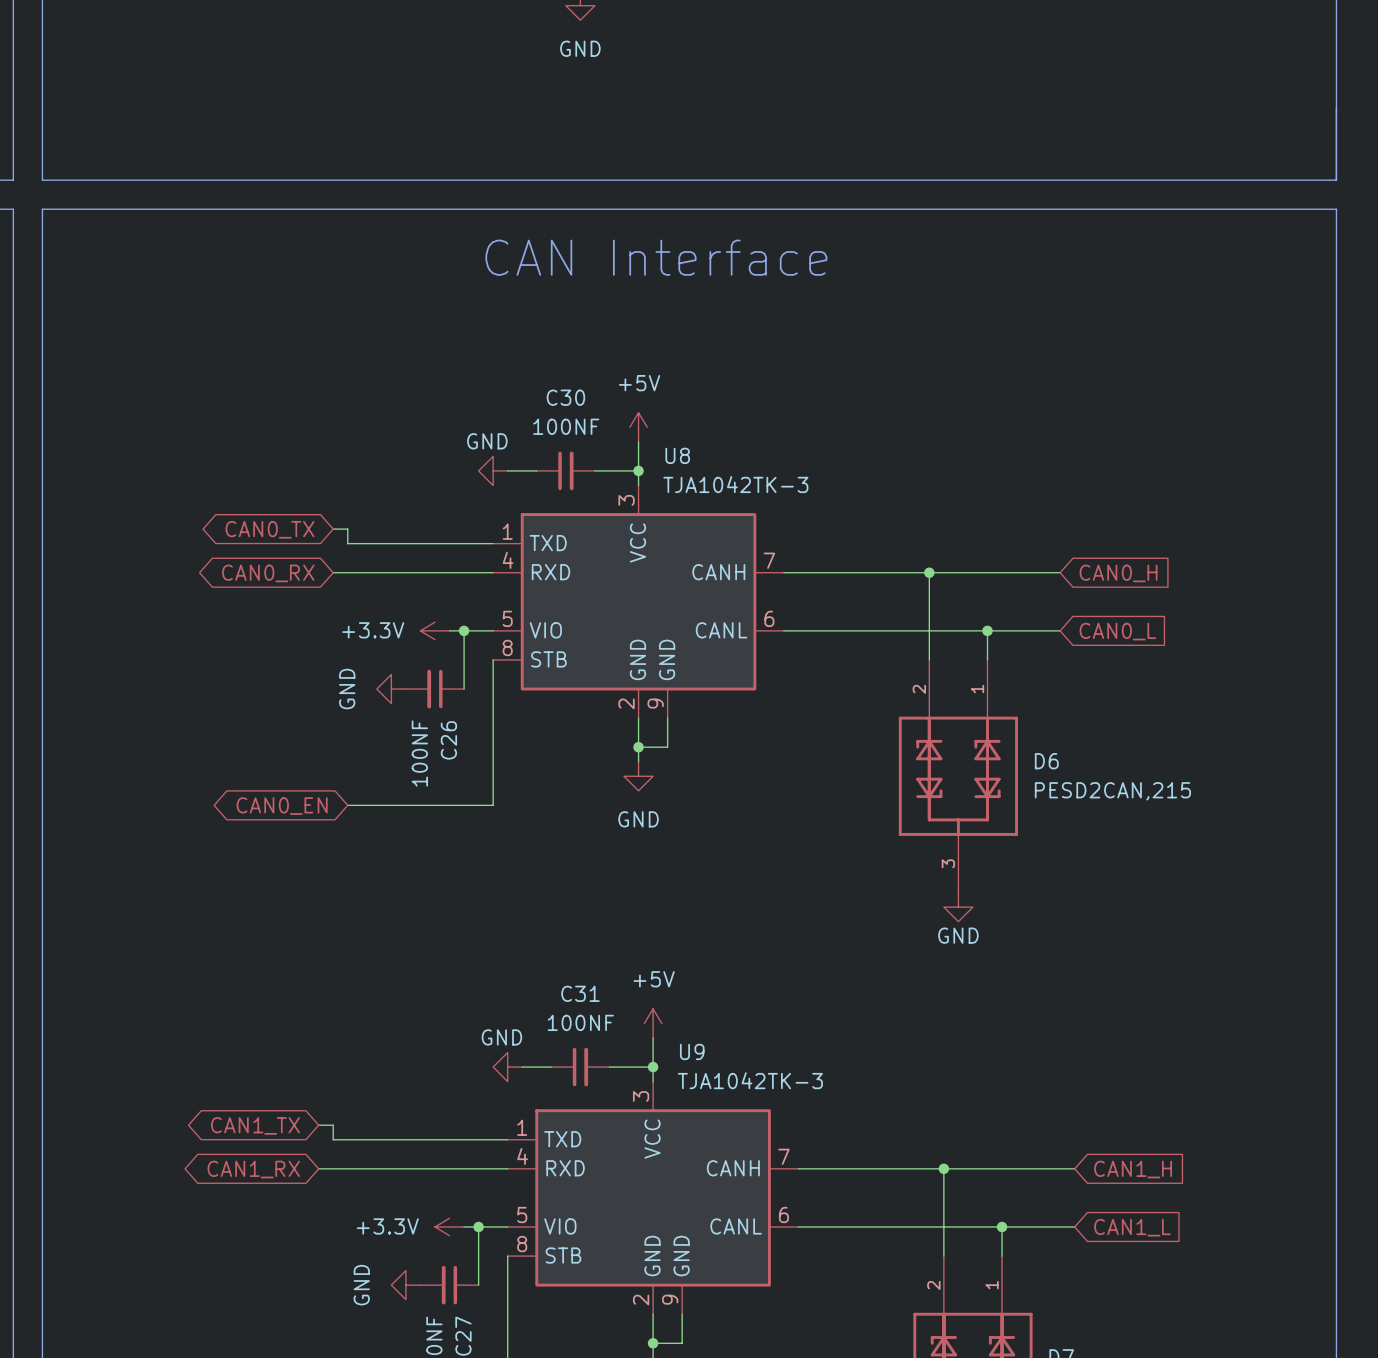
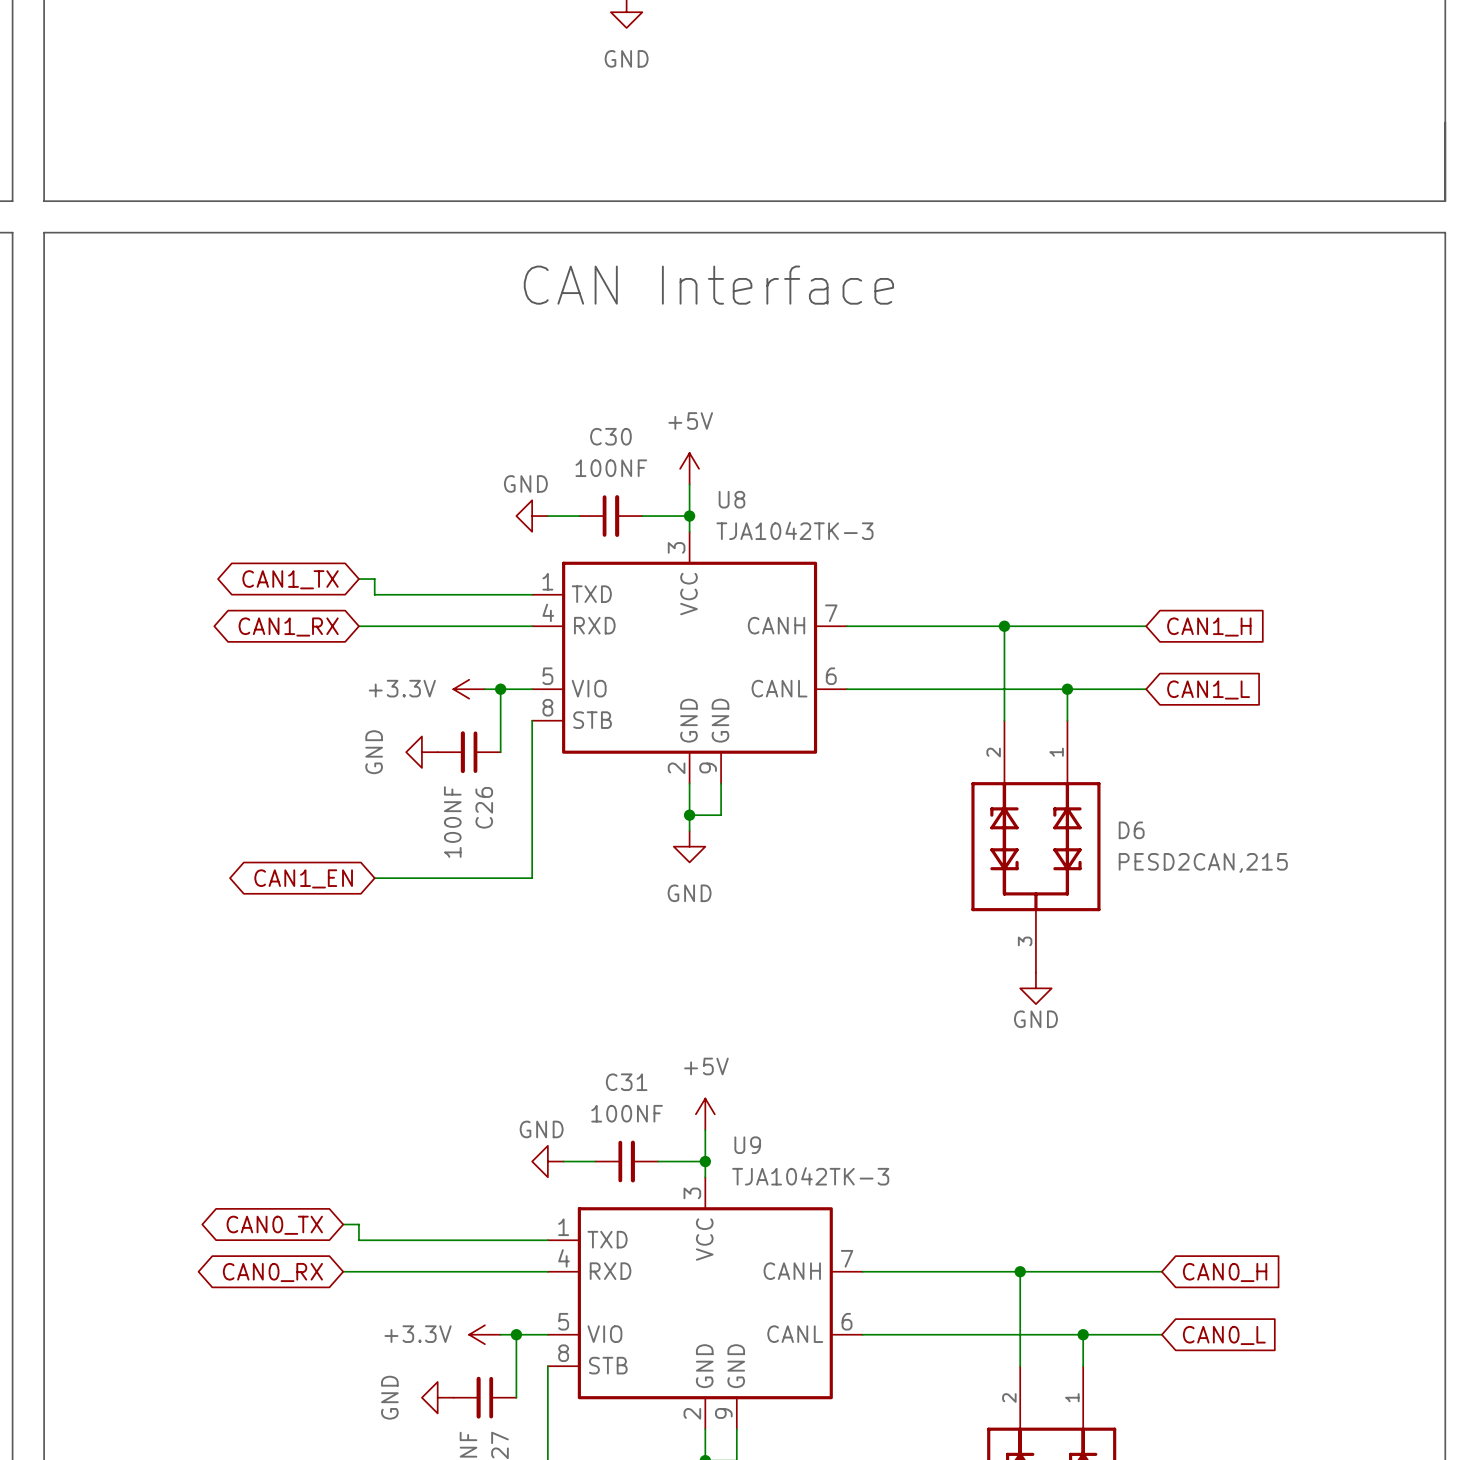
global label: CAN0_TX (270, 529) -> CAN1_TX (290, 579)
global label: CAN0_RX (268, 573) -> CAN1_RX (288, 627)
global label: CAN0_H (1118, 573) -> CAN1_H (1209, 627)
global label: CAN0_L (1117, 631) -> CAN1_L (1208, 689)
global label: CAN0_EN (282, 806) -> CAN1_EN (303, 878)
global label: CAN1_TX (255, 1125) -> CAN0_TX (274, 1225)
global label: CAN1_RX (253, 1169) -> CAN0_RX (272, 1272)
global label: CAN1_H (1133, 1169) -> CAN0_H (1225, 1272)
global label: CAN1_L (1132, 1227) -> CAN0_L (1224, 1335)

